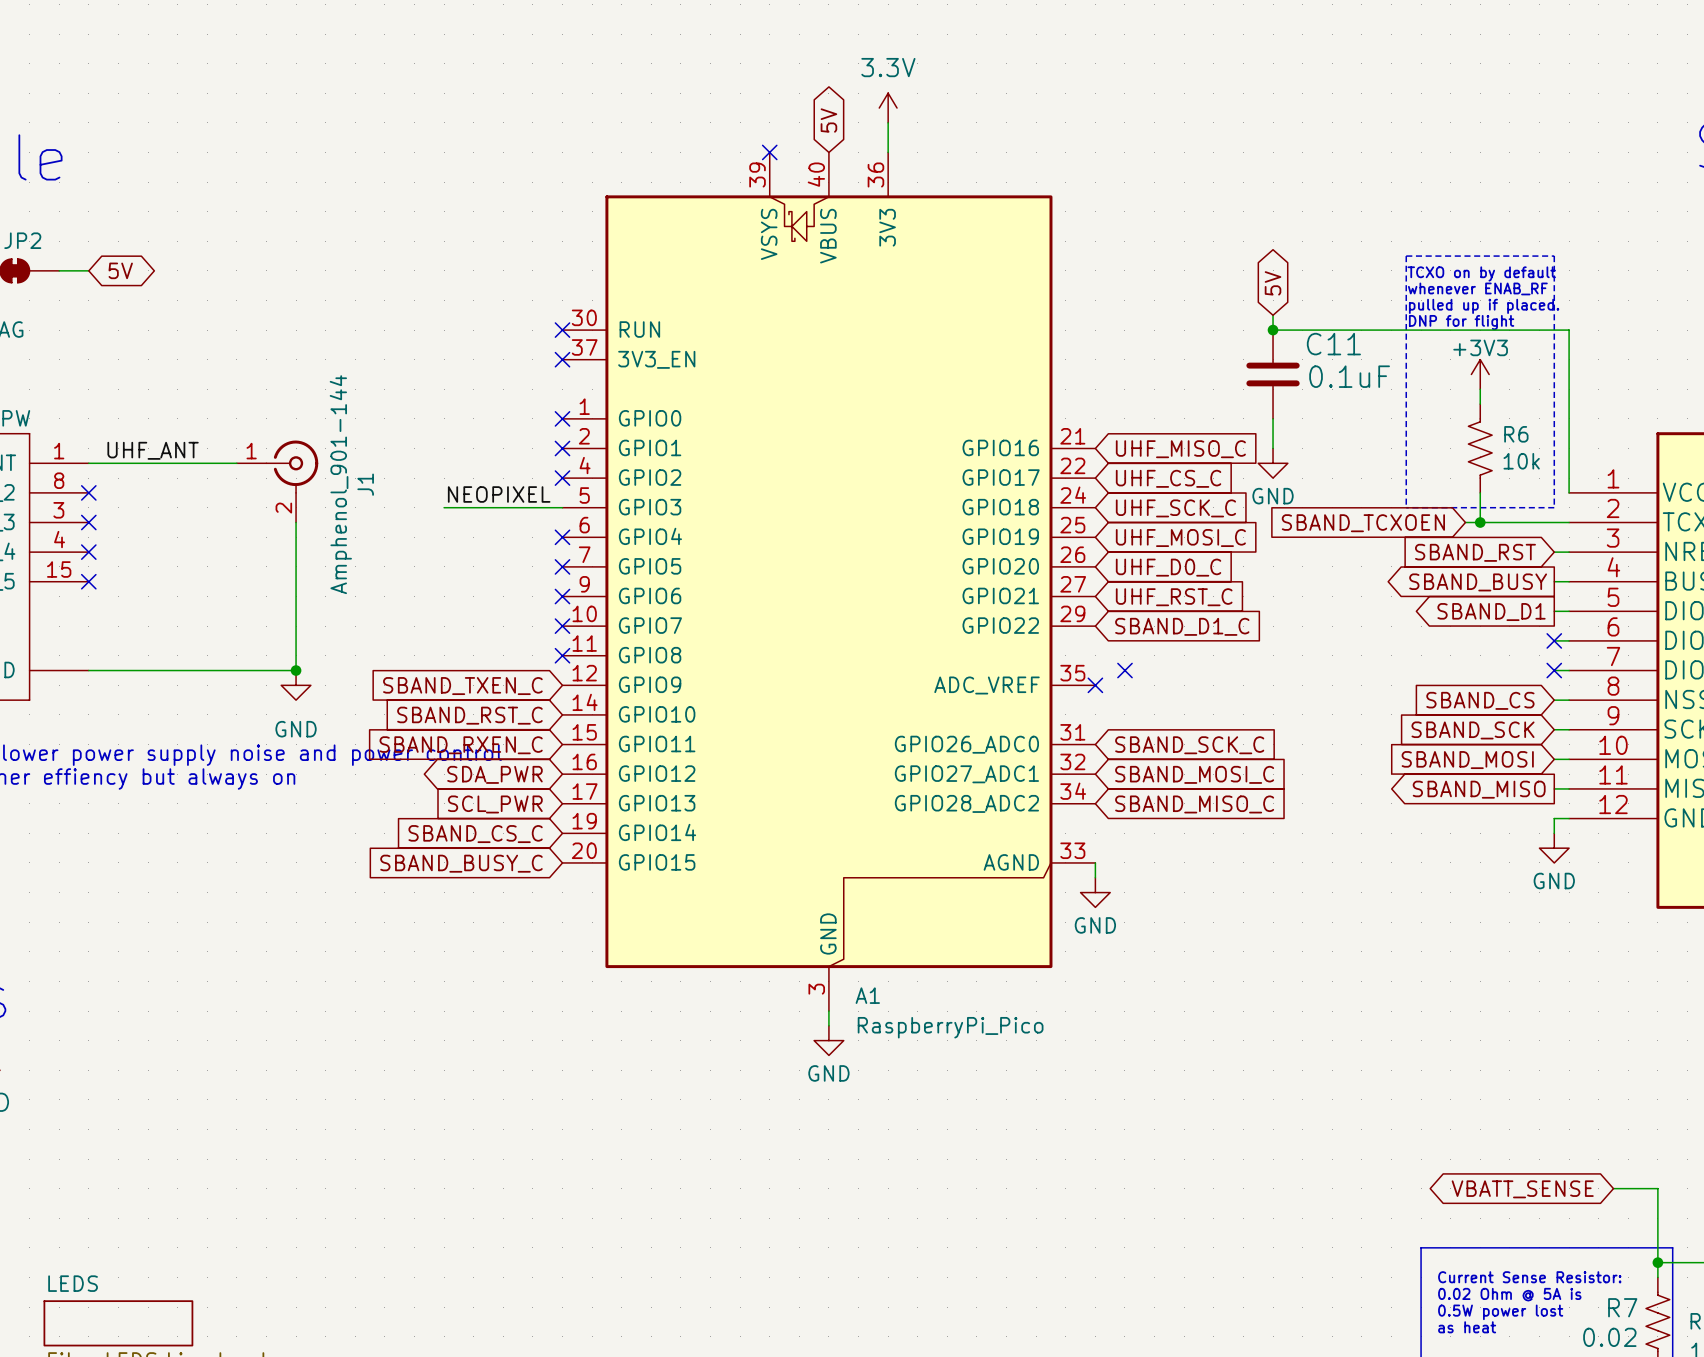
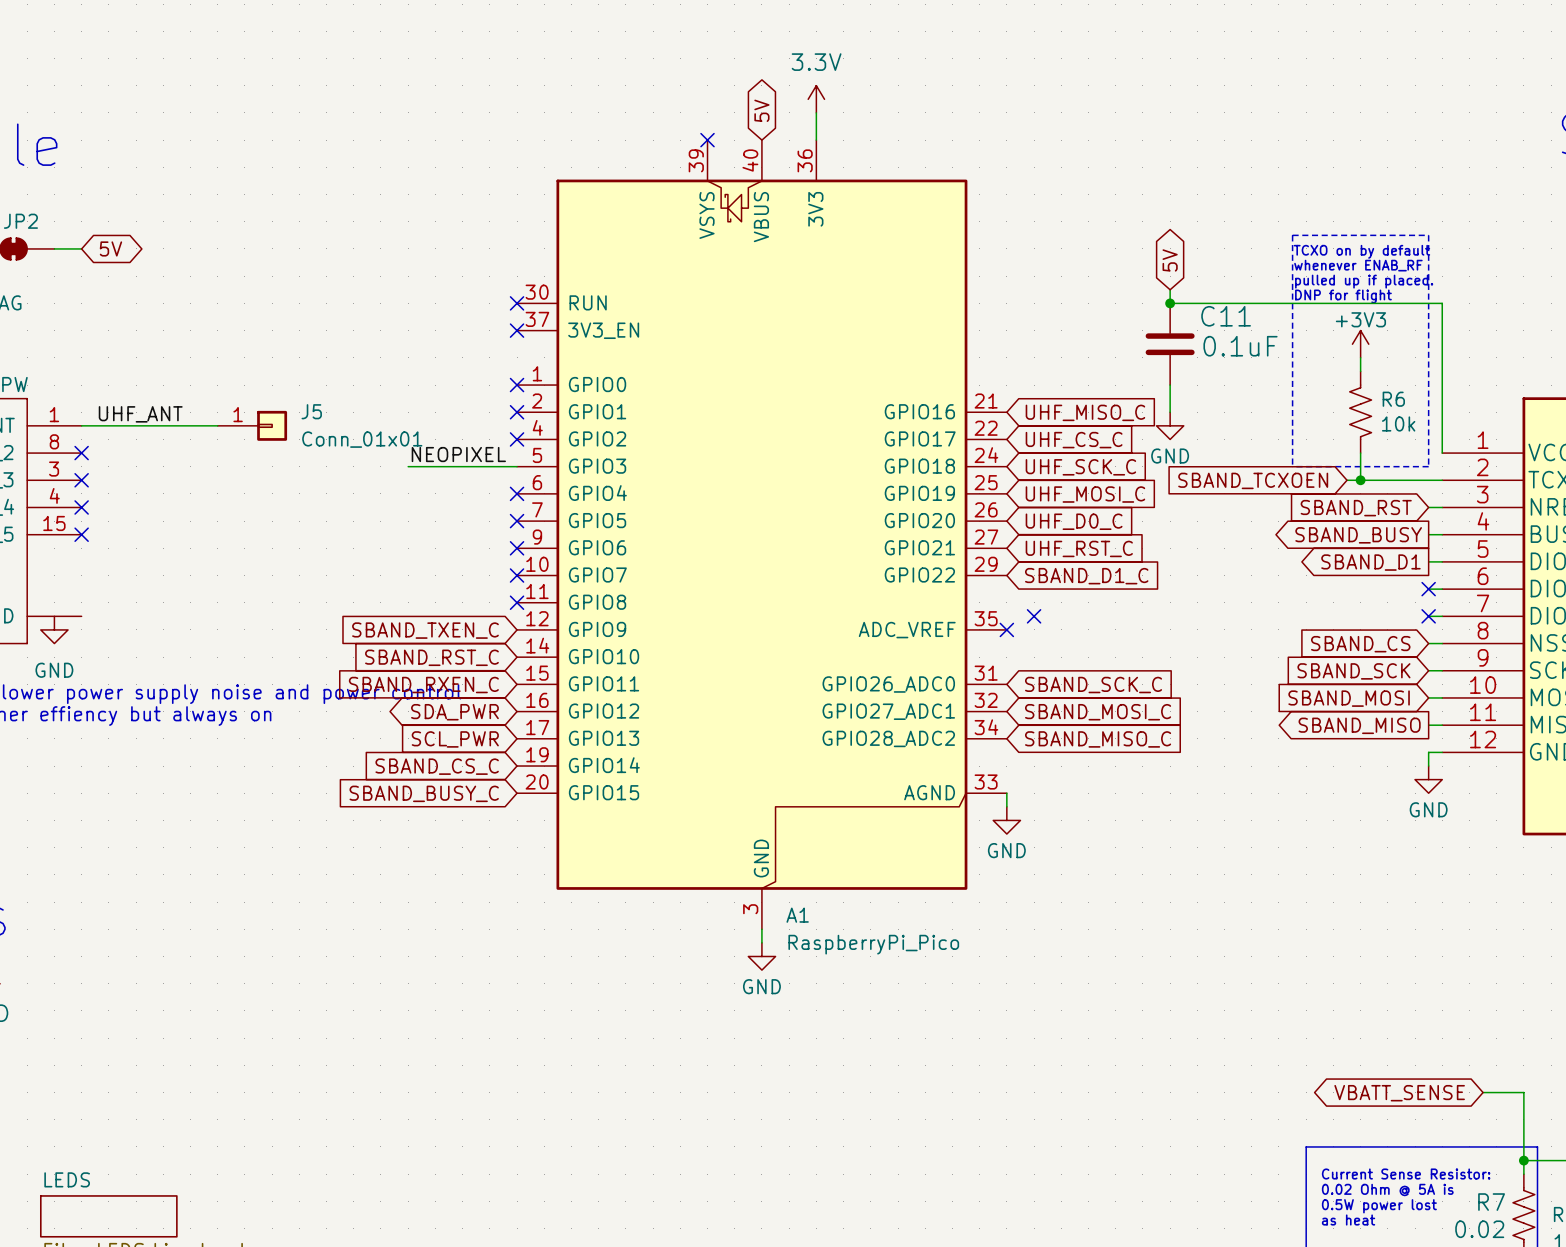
J5: none -> Conn_01x01 (252, 425)
J1: Amphenol_901-144 (277, 481) -> none
wire: (296, 522) (296, 670) (88, 670) -> none
junction: (296, 670) -> none
power symbol position: GND (296, 685) -> GND (54, 629)

